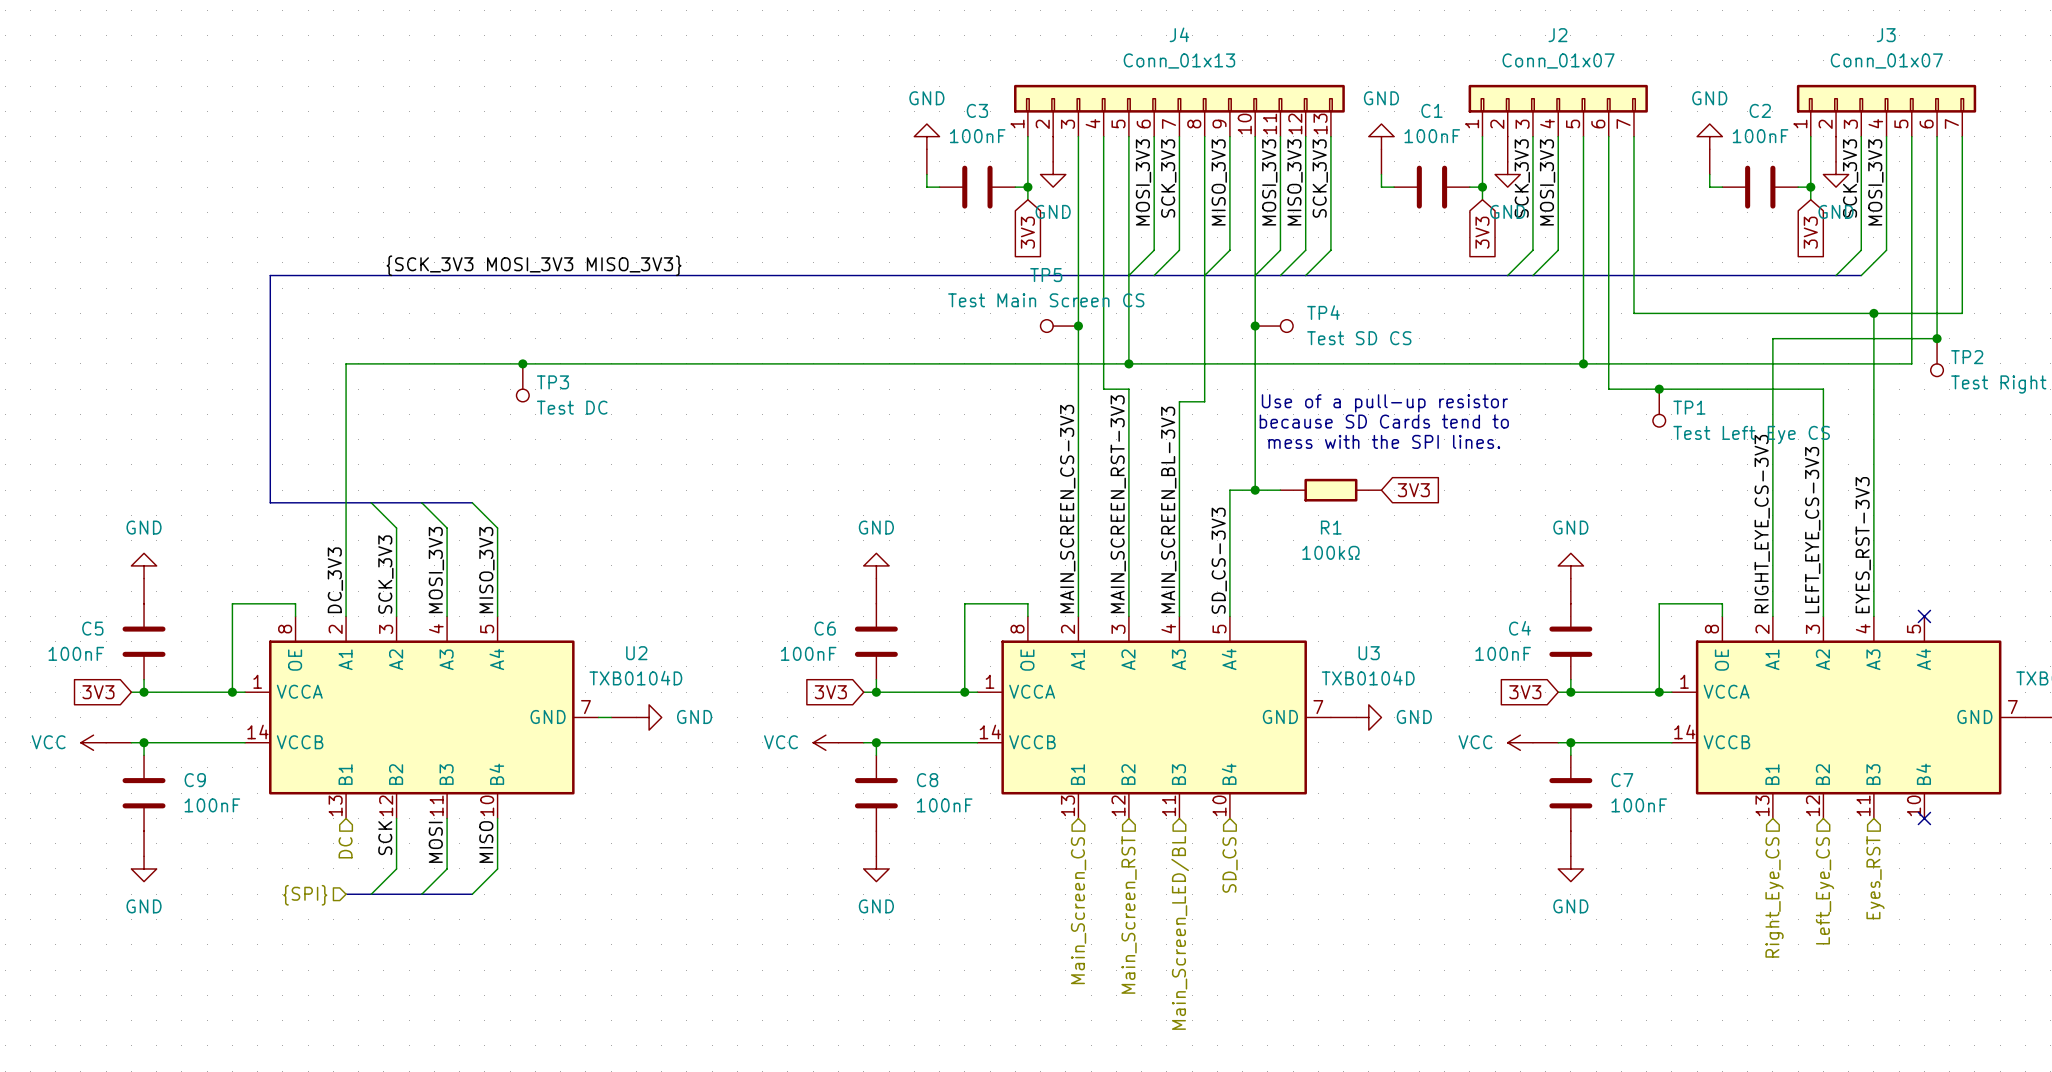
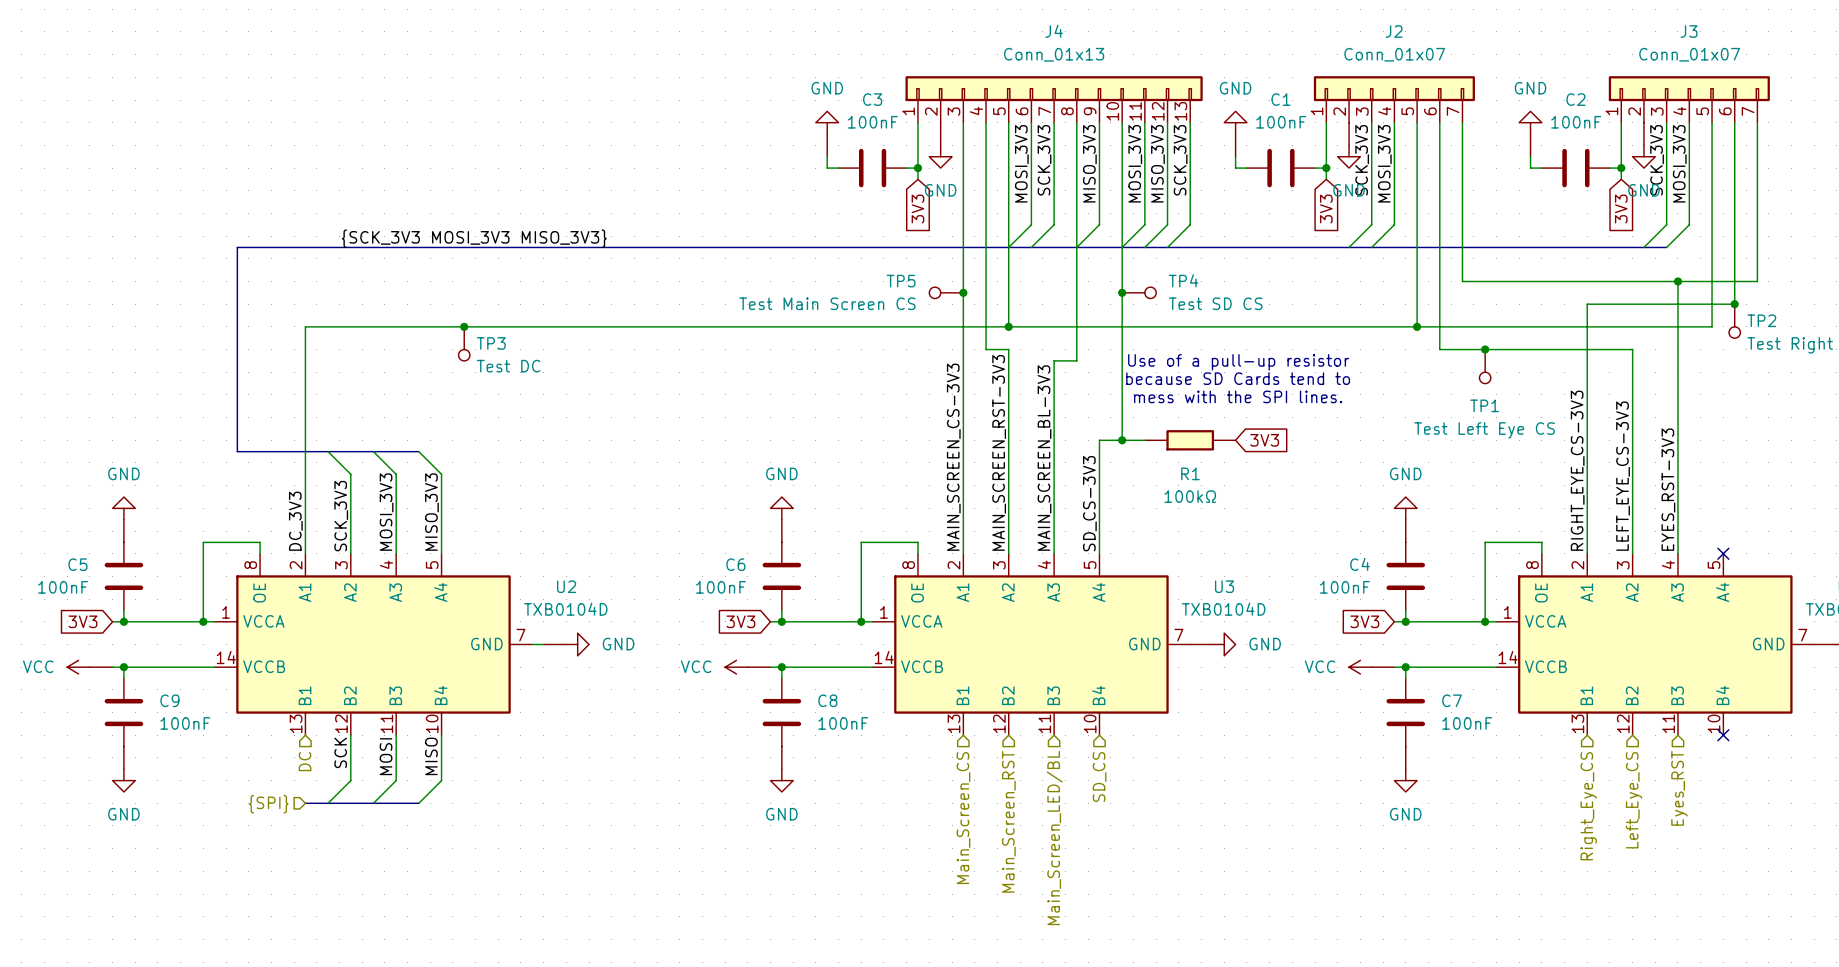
TP5 name position: TP5 (1046, 275) -> TP5 (901, 281)
TP5 value position: Test Main Screen CS (1046, 300) -> Test Main Screen CS (827, 303)
TP1 name position: TP1 (1689, 407) -> TP1 (1484, 405)
TP1 value position: Test Left Eye CS (1751, 434) -> Test Left Eye CS (1484, 430)

